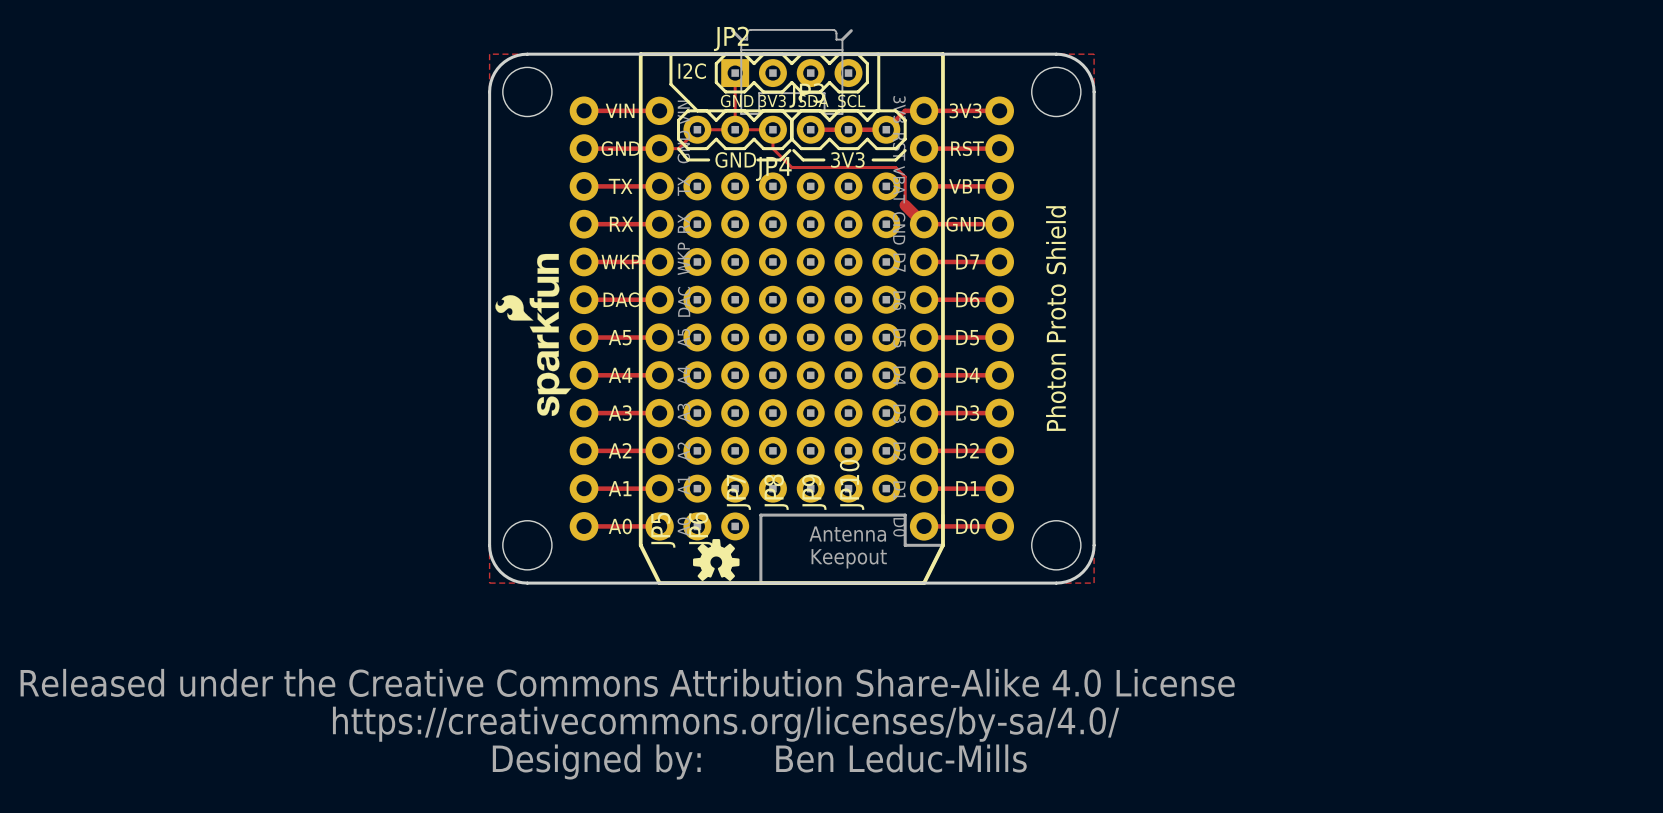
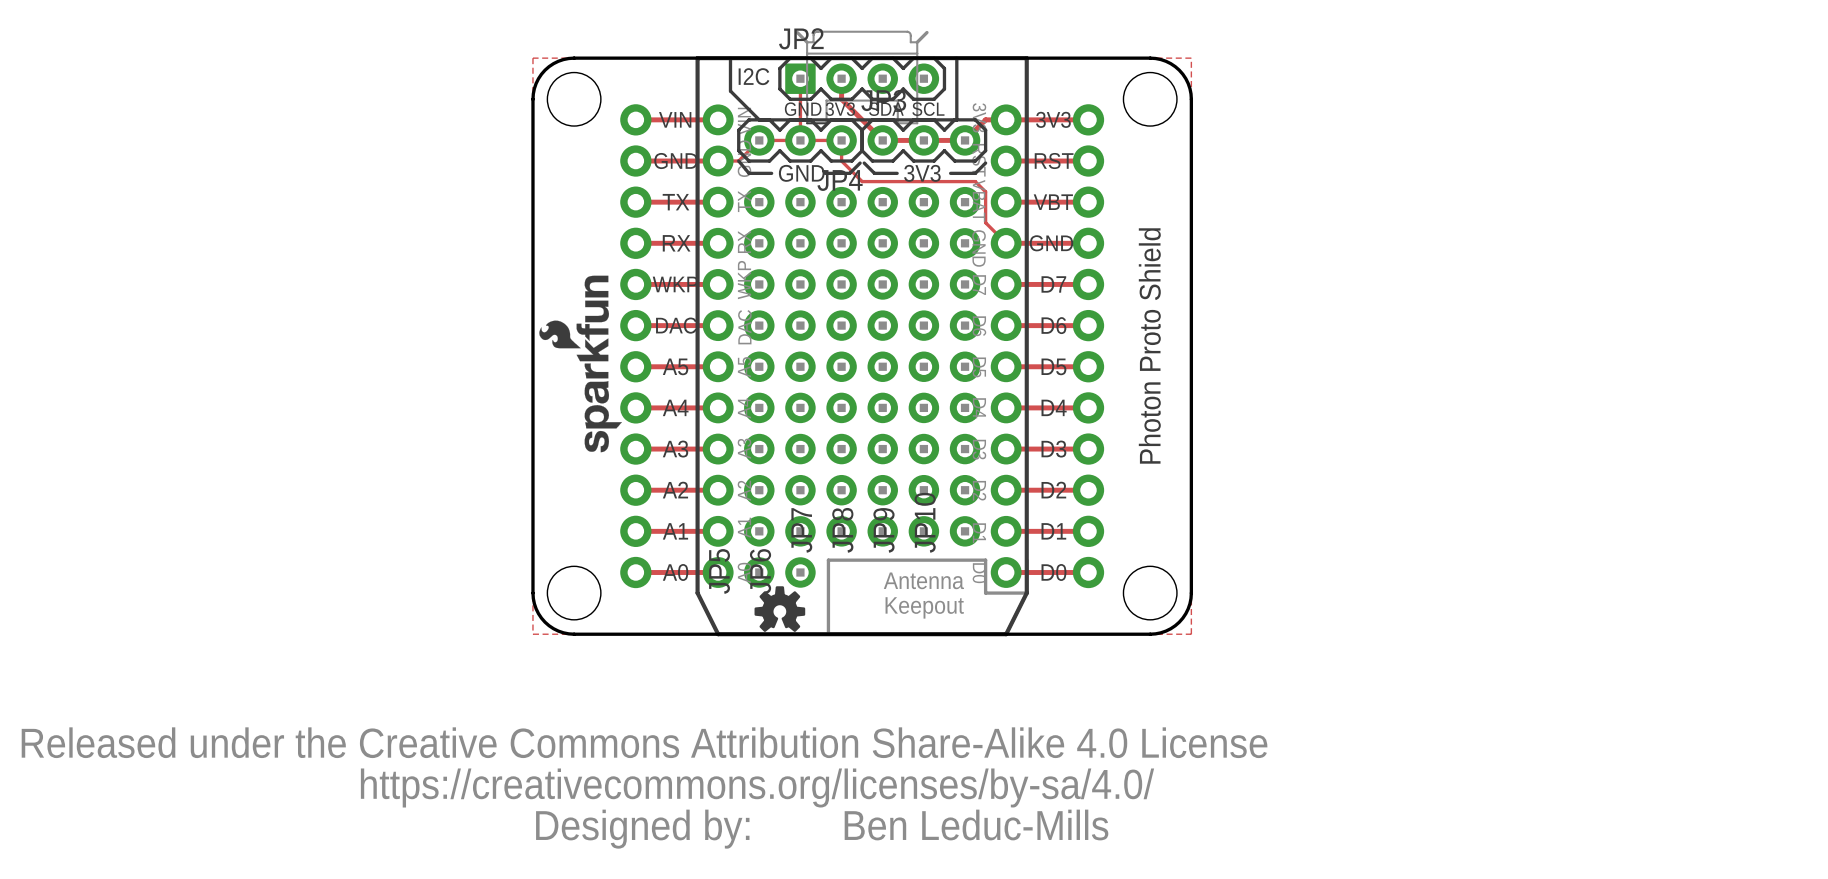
part footprint: [502, 28, 1081, 585] -> [547, 30, 1177, 637]
track: none -> (841, 78) (841, 99) (882, 140)
track width: thick (905, 205) (924, 224) -> thin (985, 222) (1006, 243)

